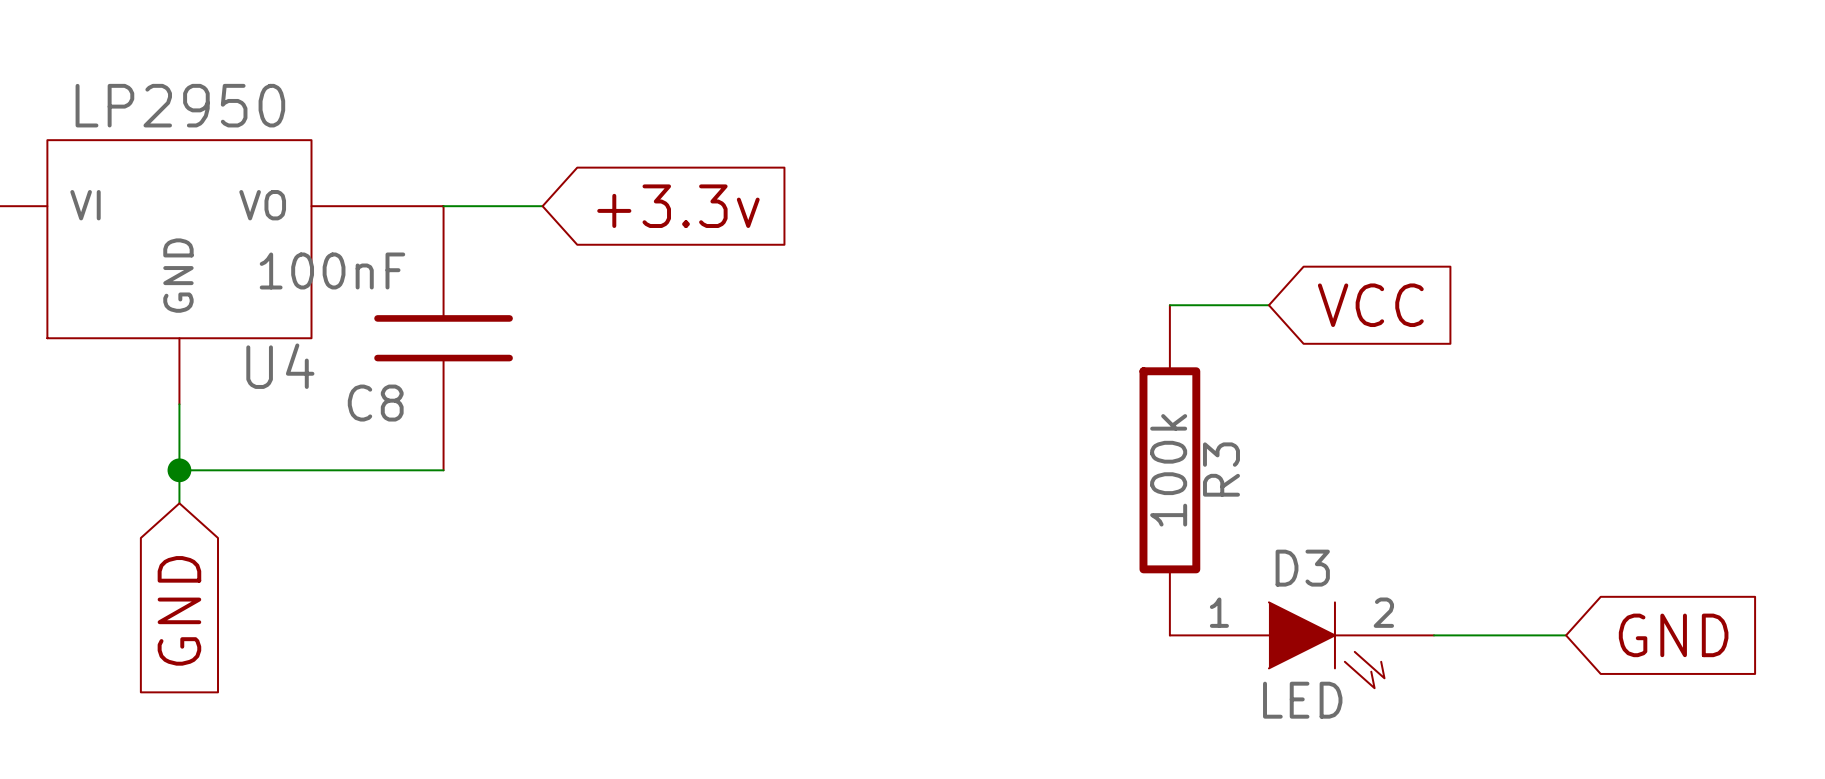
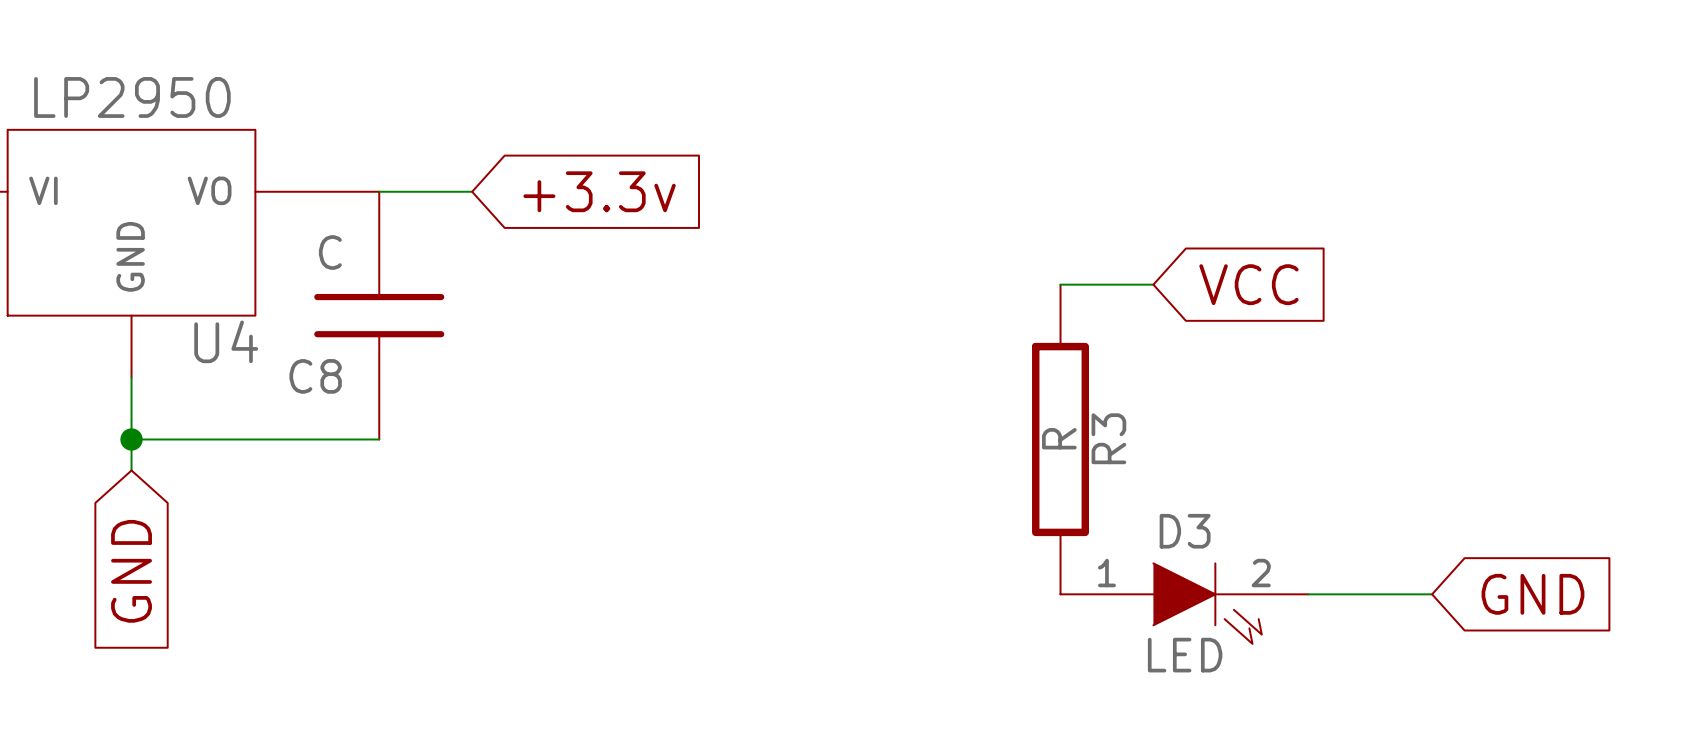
C8 value: 100nF (332, 270) -> C (330, 252)
R3 value: 100k (1168, 470) -> R (1059, 438)

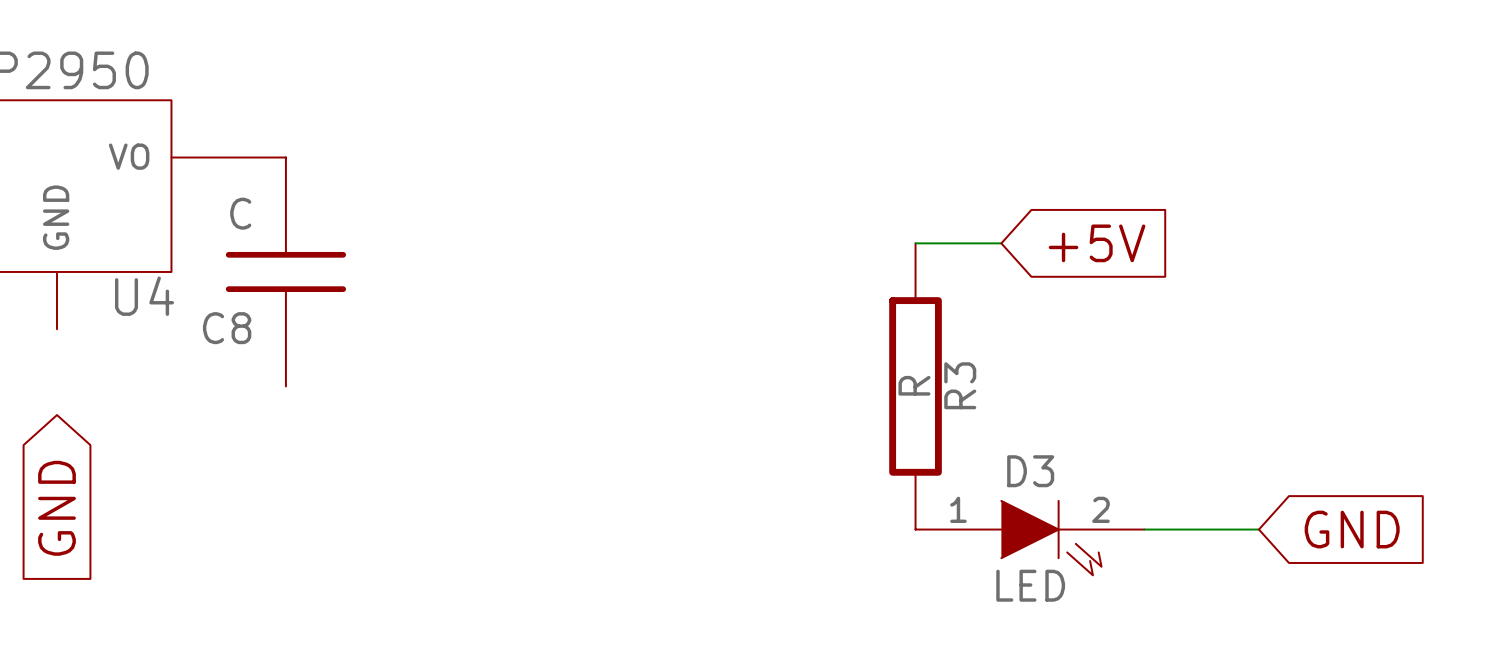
wire: (379, 191) (472, 191) -> none
global label: +3.3v (599, 191) -> none
global label: VCC (1248, 284) -> +5V (1097, 243)
wire: (131, 377) (131, 470) -> none
wire: (131, 439) (379, 439) -> none
junction: (131, 439) -> none

